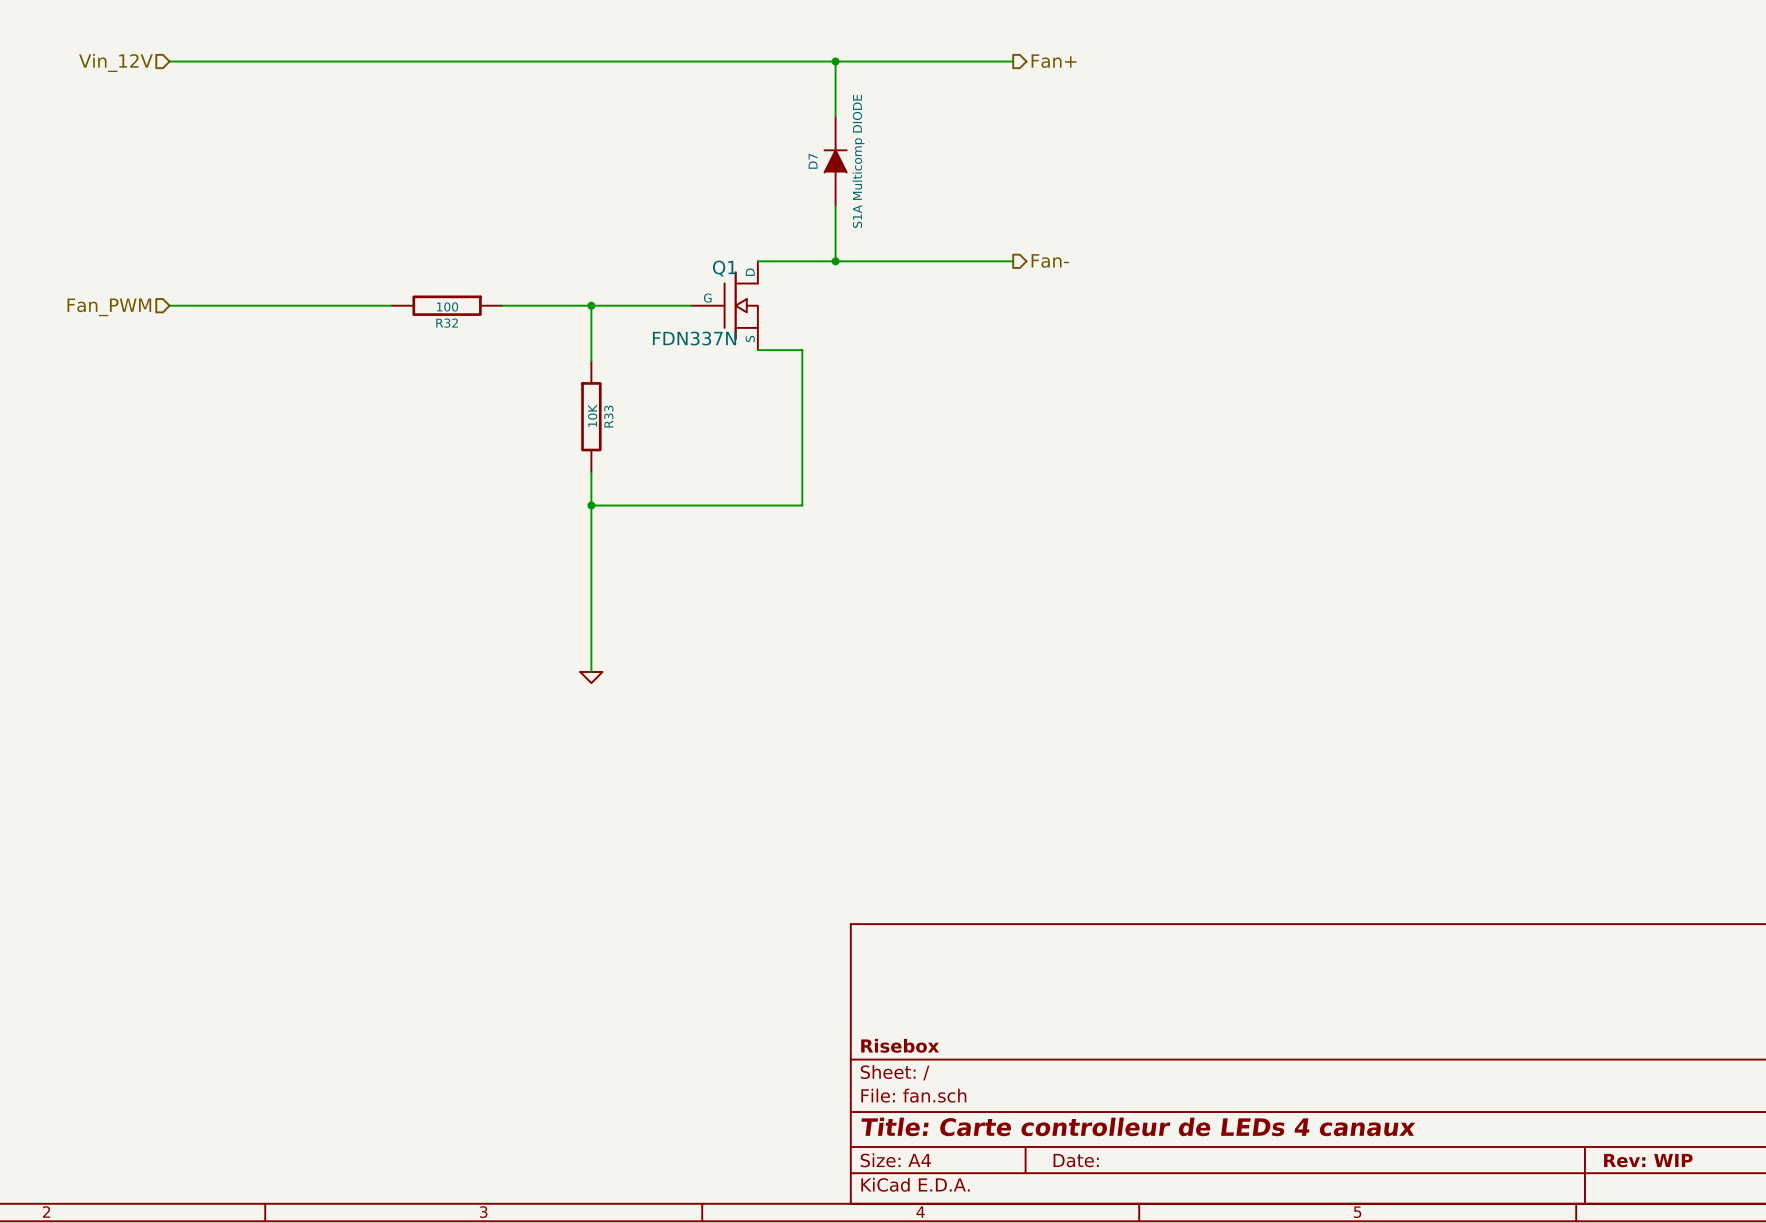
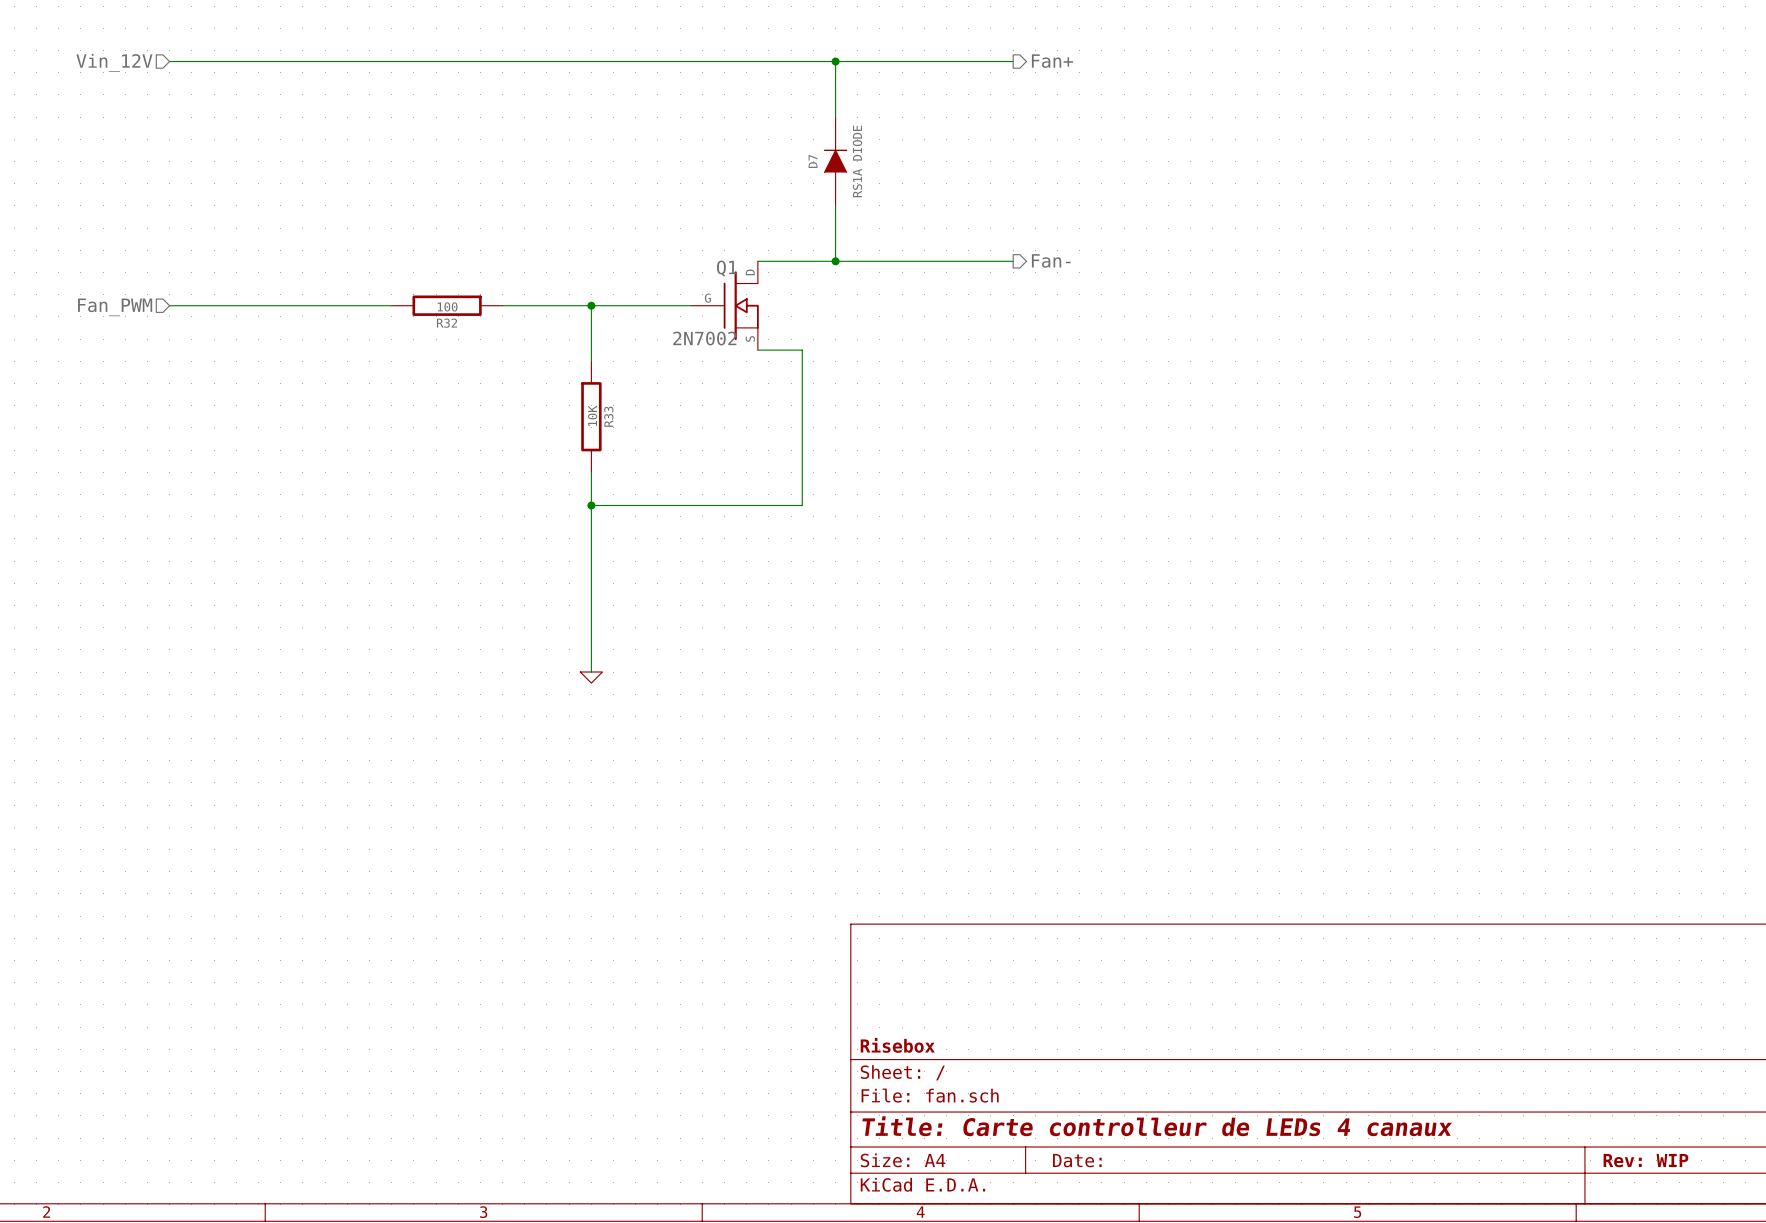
D7 value: S1A Multicomp DIODE (858, 161) -> RS1A DIODE (857, 161)
Q1 value: FDN337N (694, 338) -> 2N7002 (704, 338)

